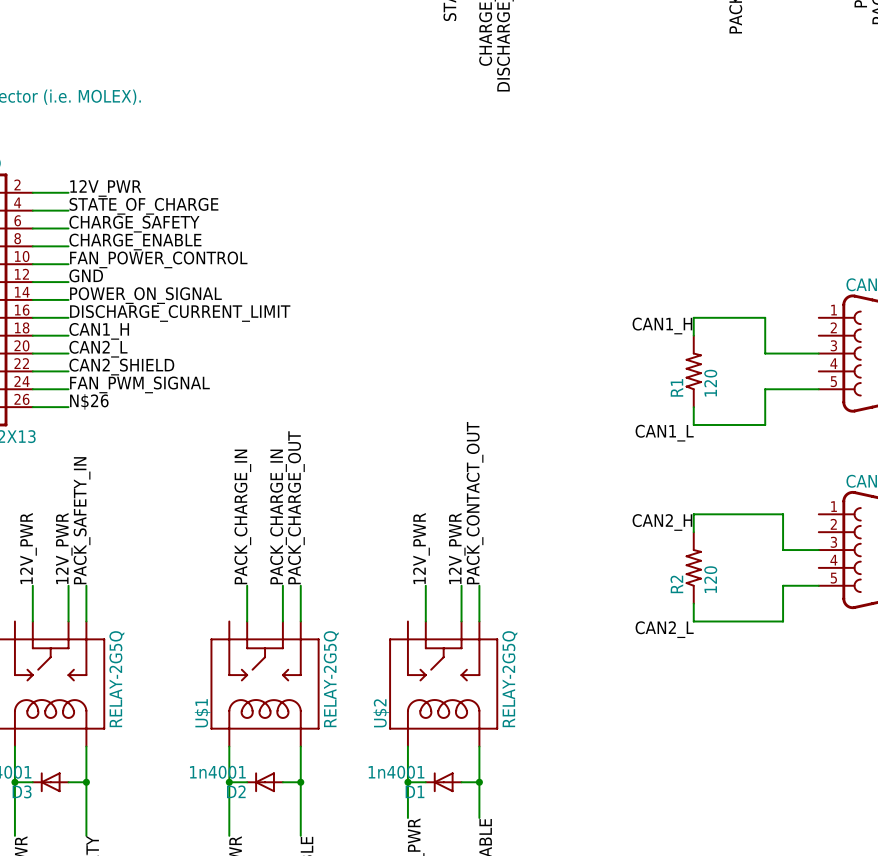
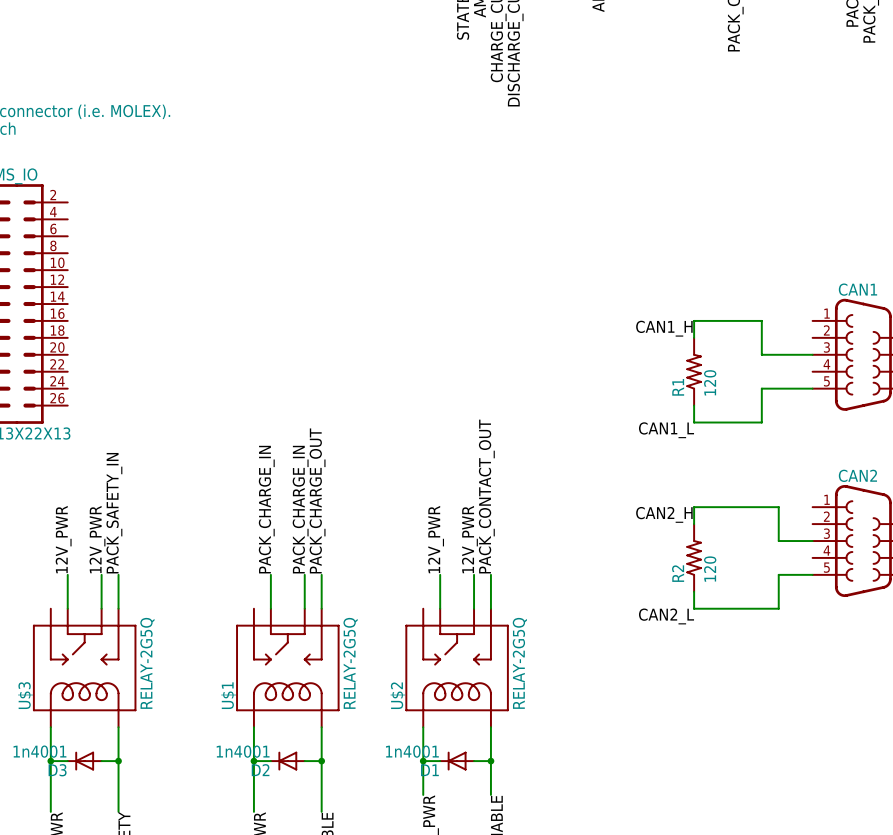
label: 12V_PWR (105, 188) -> none
wire: (32, 192) (68, 192) -> none
label: STATE_OF_CHARGE (143, 206) -> none
wire: (32, 210) (68, 210) -> none
label: CHARGE_SAFETY (134, 224) -> none
wire: (32, 228) (68, 228) -> none
label: CHARGE_ENABLE (135, 242) -> none
wire: (32, 246) (68, 246) -> none
label: FAN_POWER_CONTROL (158, 259) -> none
wire: (32, 264) (68, 264) -> none
label: GND (86, 275) -> none
wire: (32, 282) (68, 282) -> none
label: POWER_ON_SIGNAL (145, 295) -> none
wire: (32, 299) (68, 299) -> none
label: DISCHARGE_CURRENT_LIMIT (180, 313) -> none
wire: (32, 317) (68, 317) -> none
label: CAN1_H (99, 331) -> none
wire: (32, 335) (68, 335) -> none
label: CAN2_L (98, 349) -> none
wire: (32, 353) (68, 353) -> none
label: CAN2_SHIELD (121, 367) -> none
wire: (32, 371) (68, 371) -> none
label: FAN_PWM_SIGNAL (139, 384) -> none
wire: (32, 389) (68, 389) -> none
label: N$26 (89, 401) -> none
wire: (32, 407) (68, 407) -> none

